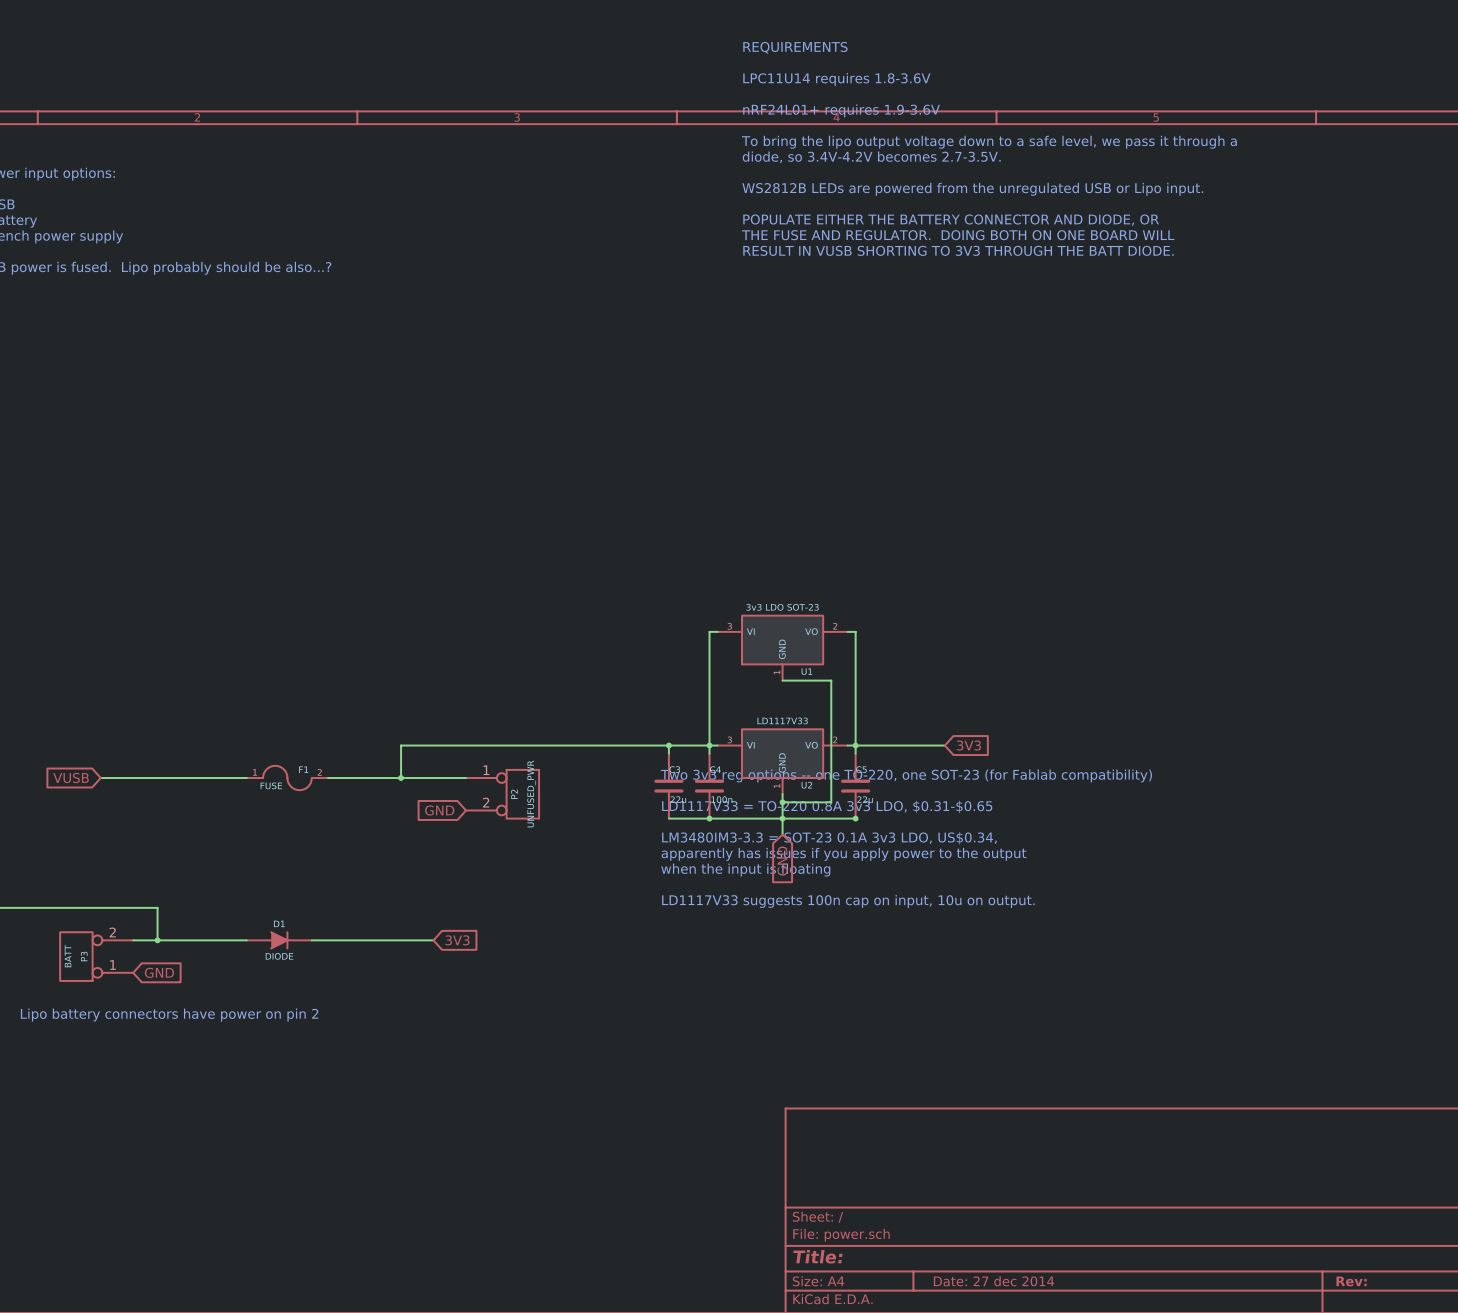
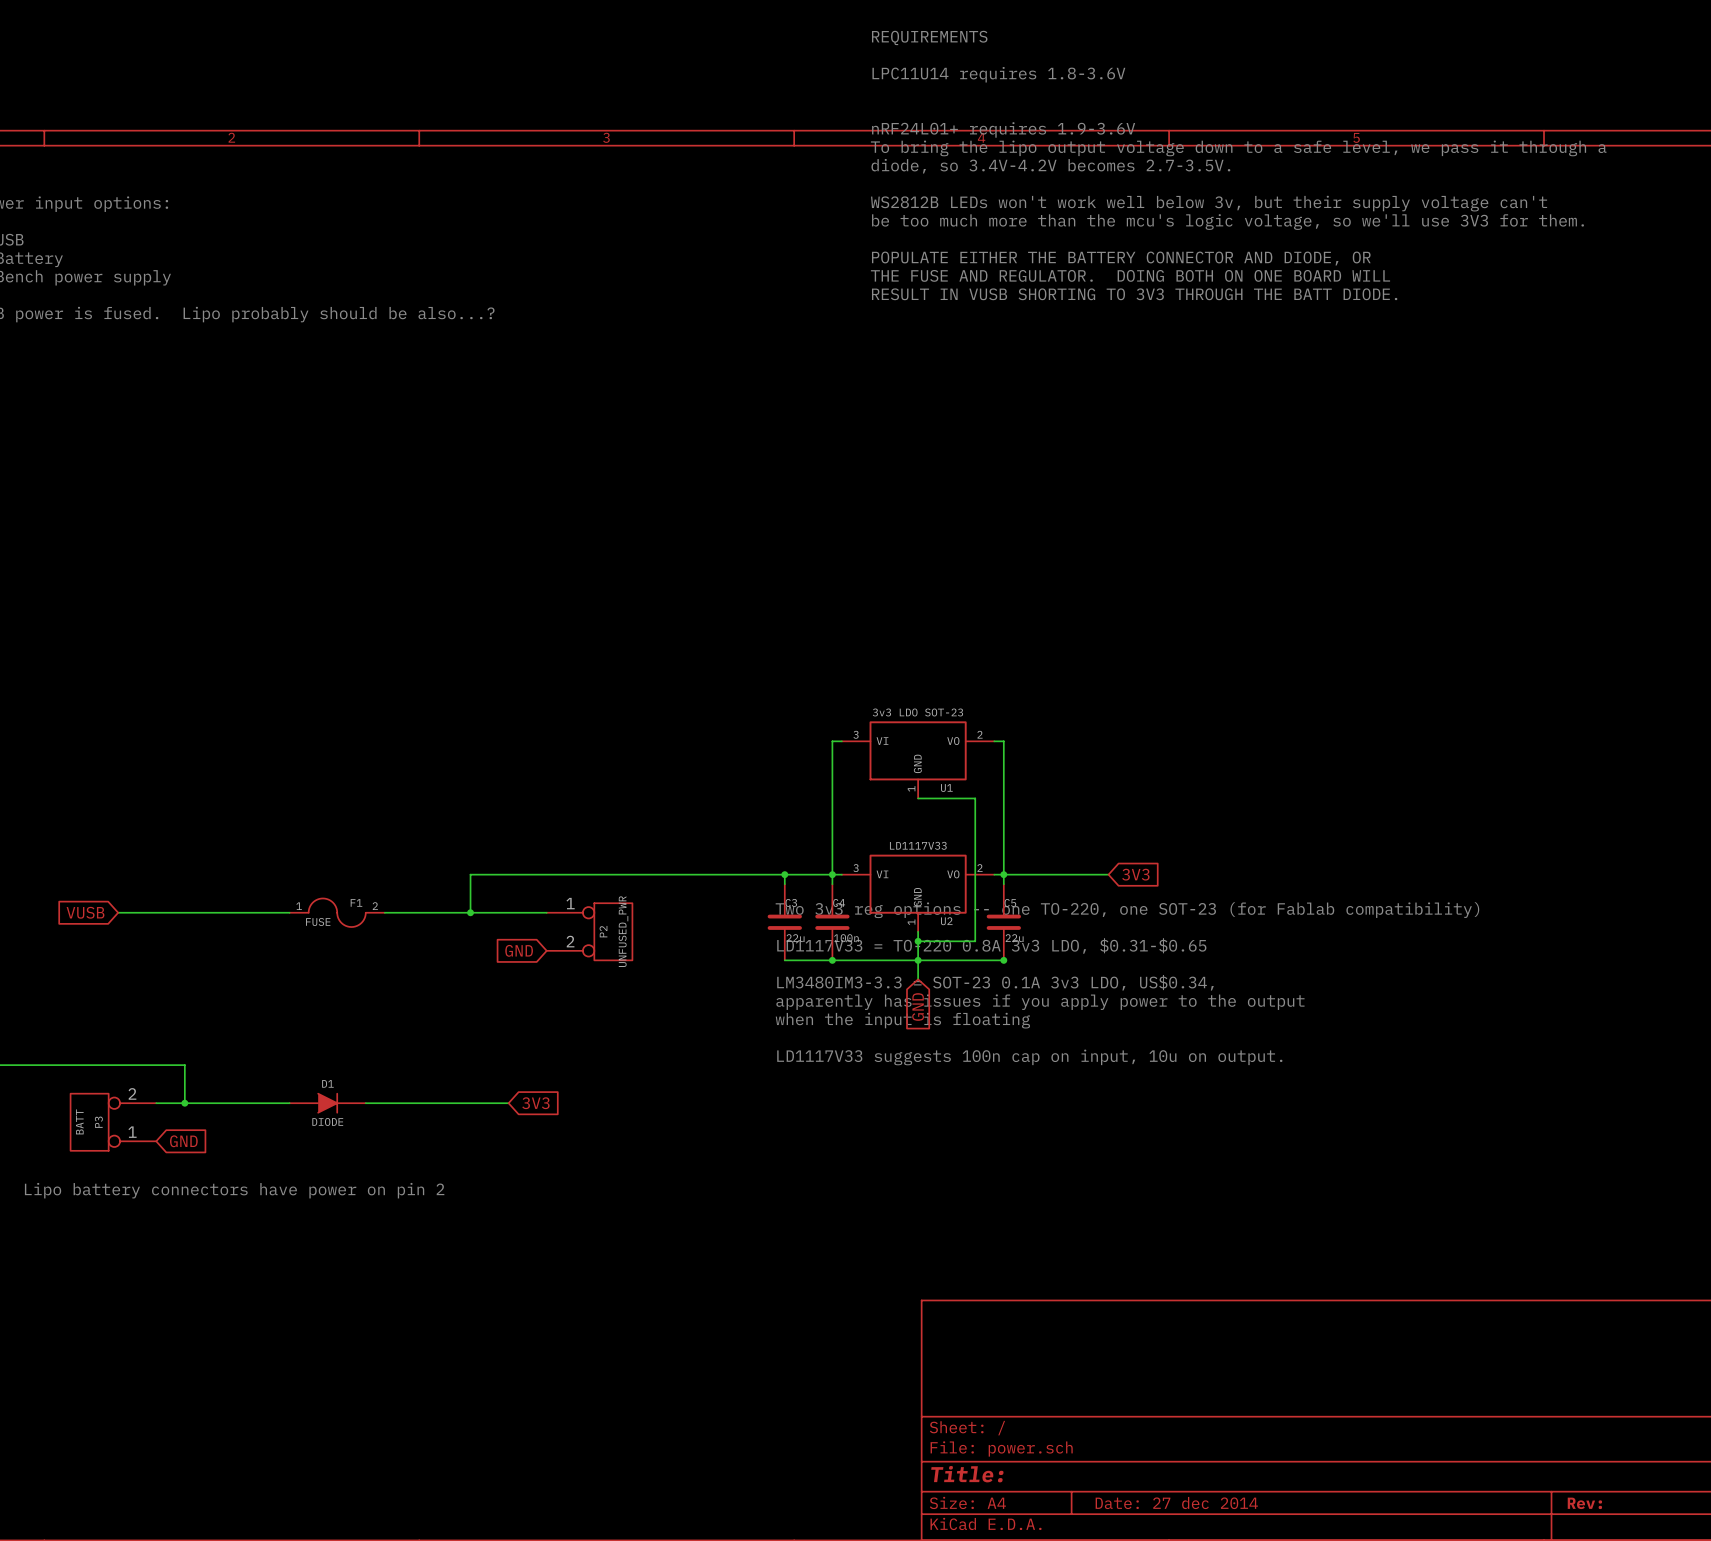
text position: REQUIREMENTS (795, 47) -> REQUIREMENTS (929, 37)
text position: LPC11U14 requires 1.8-3.6V (836, 79) -> LPC11U14 requires 1.8-3.6V (998, 74)
text: none -> To bring the lipo output voltage down to a safe level, we pass it through a (1238, 148)
text: To bring the lipo output voltage down to a safe level, we pass it through a (989, 142) -> diode, so 3.4V-4.2V becomes 2.7-3.5V. (1050, 166)
text: diode, so 3.4V-4.2V becomes 2.7-3.5V. (871, 157) -> none
text: none -> WS2812B LEDs won't work well below 3v, but their supply voltage can't (1209, 203)
text: WS2812B LEDs are powered from the unregulated USB or Lipo input. (972, 189) -> be too much more than the mcu's logic voltage, so we'll use 3V3 for them. (1227, 222)

